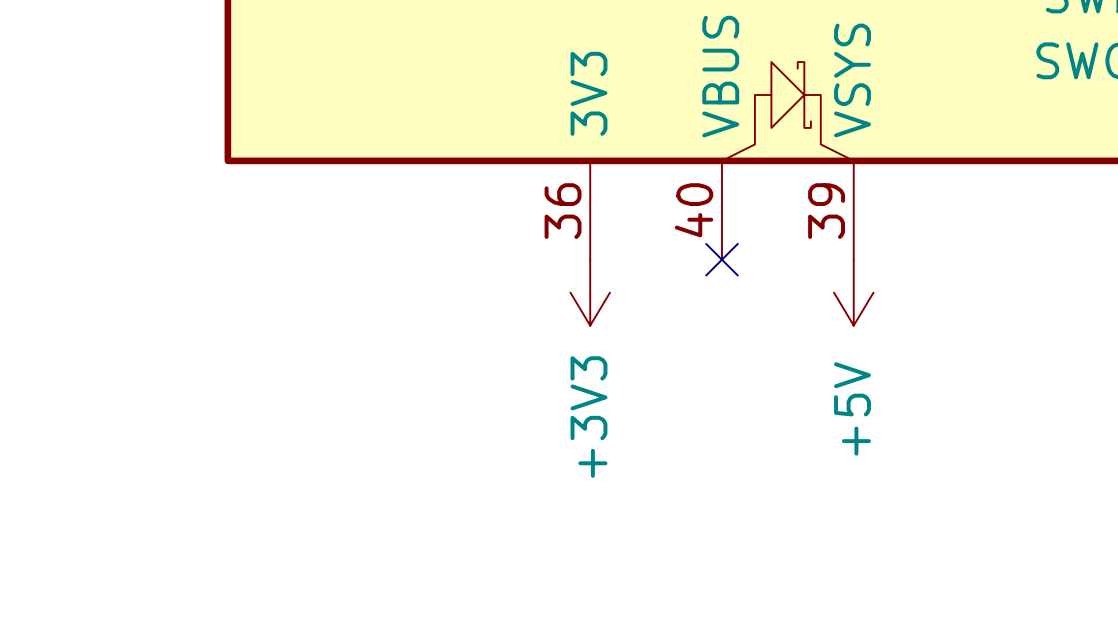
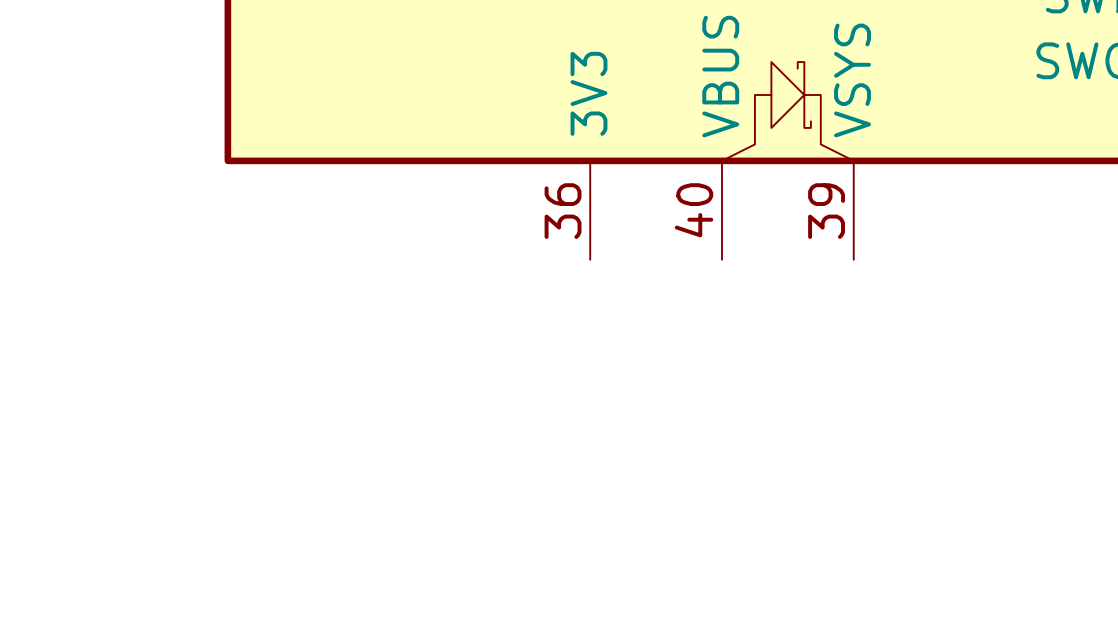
no-connect mark: (721, 259) -> none
power symbol: +3V3 (590, 292) -> none
power symbol: +5V (853, 292) -> none

